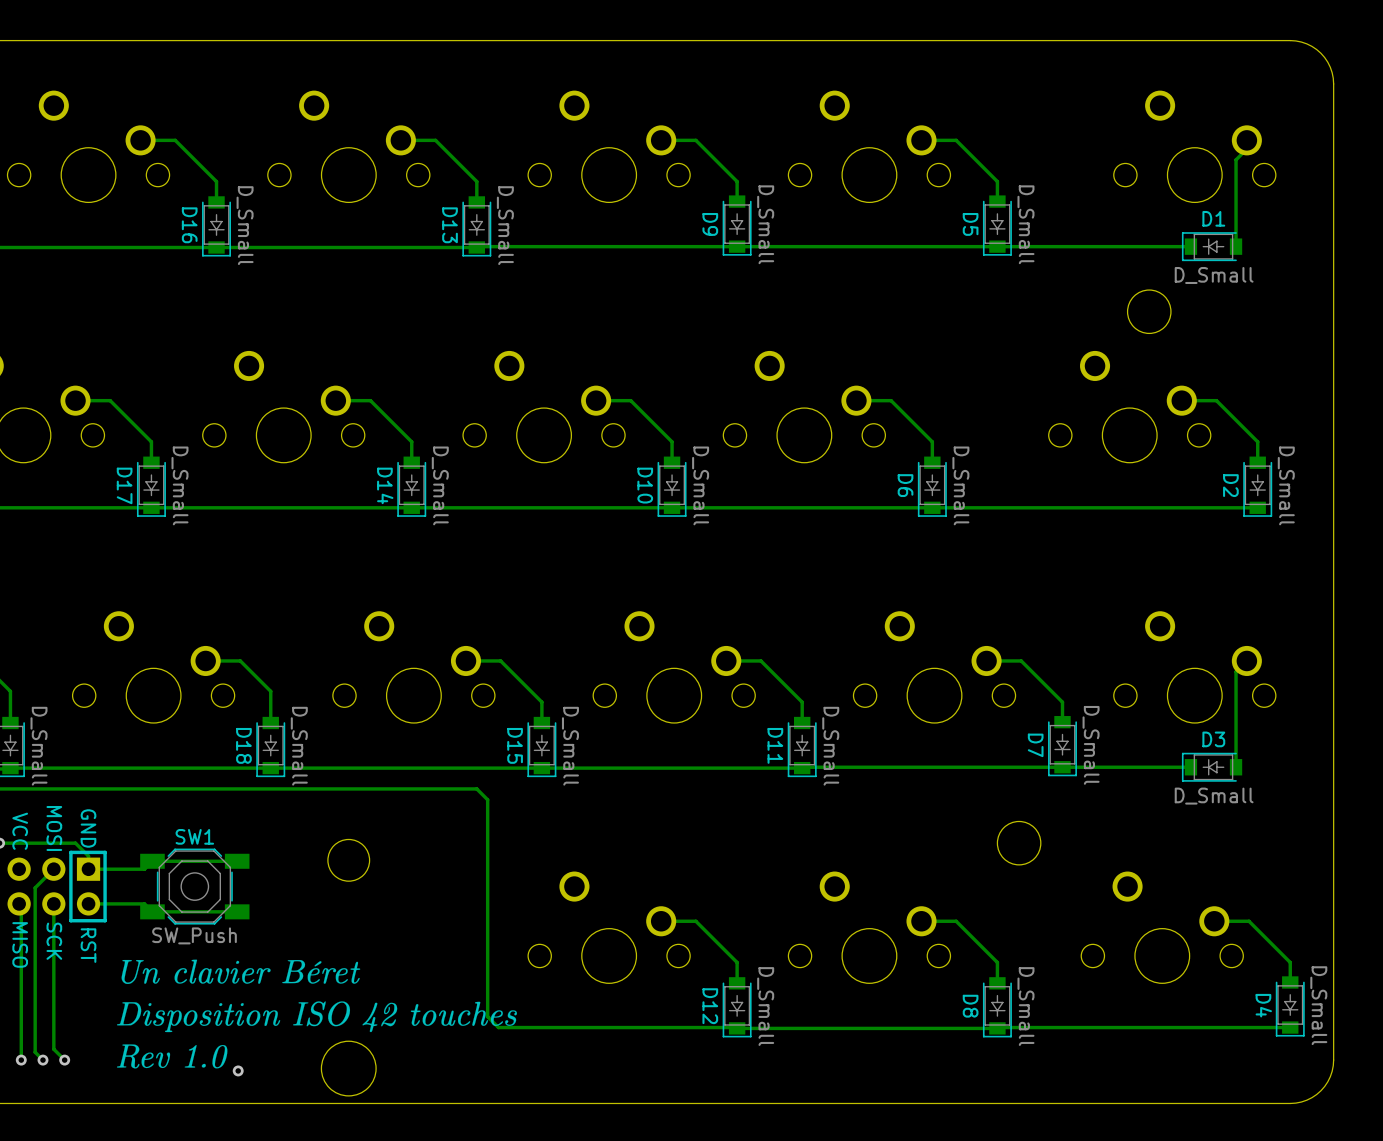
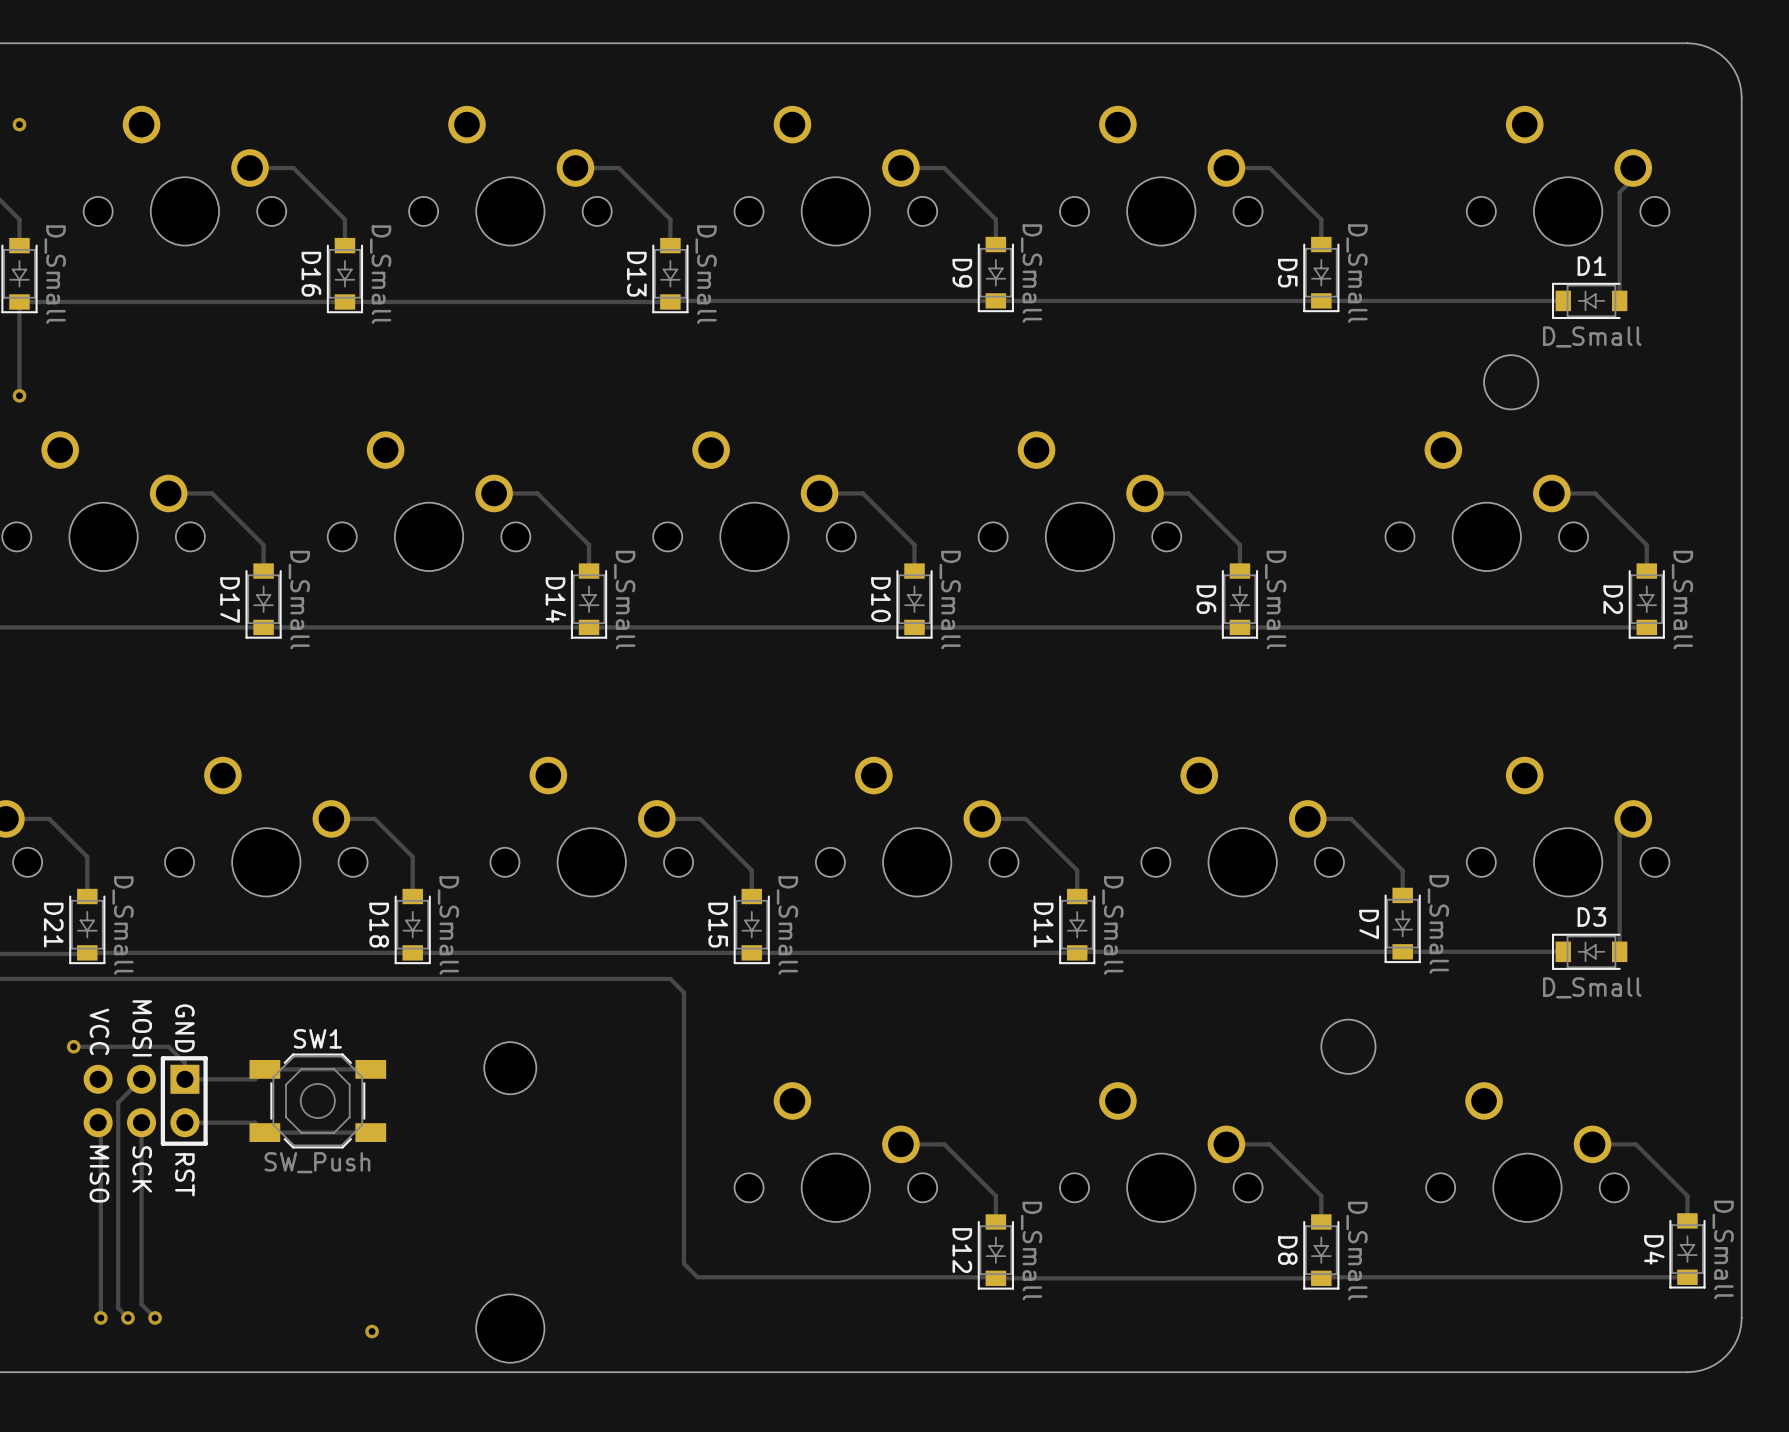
drawing: [116, 959, 517, 1069] -> none

